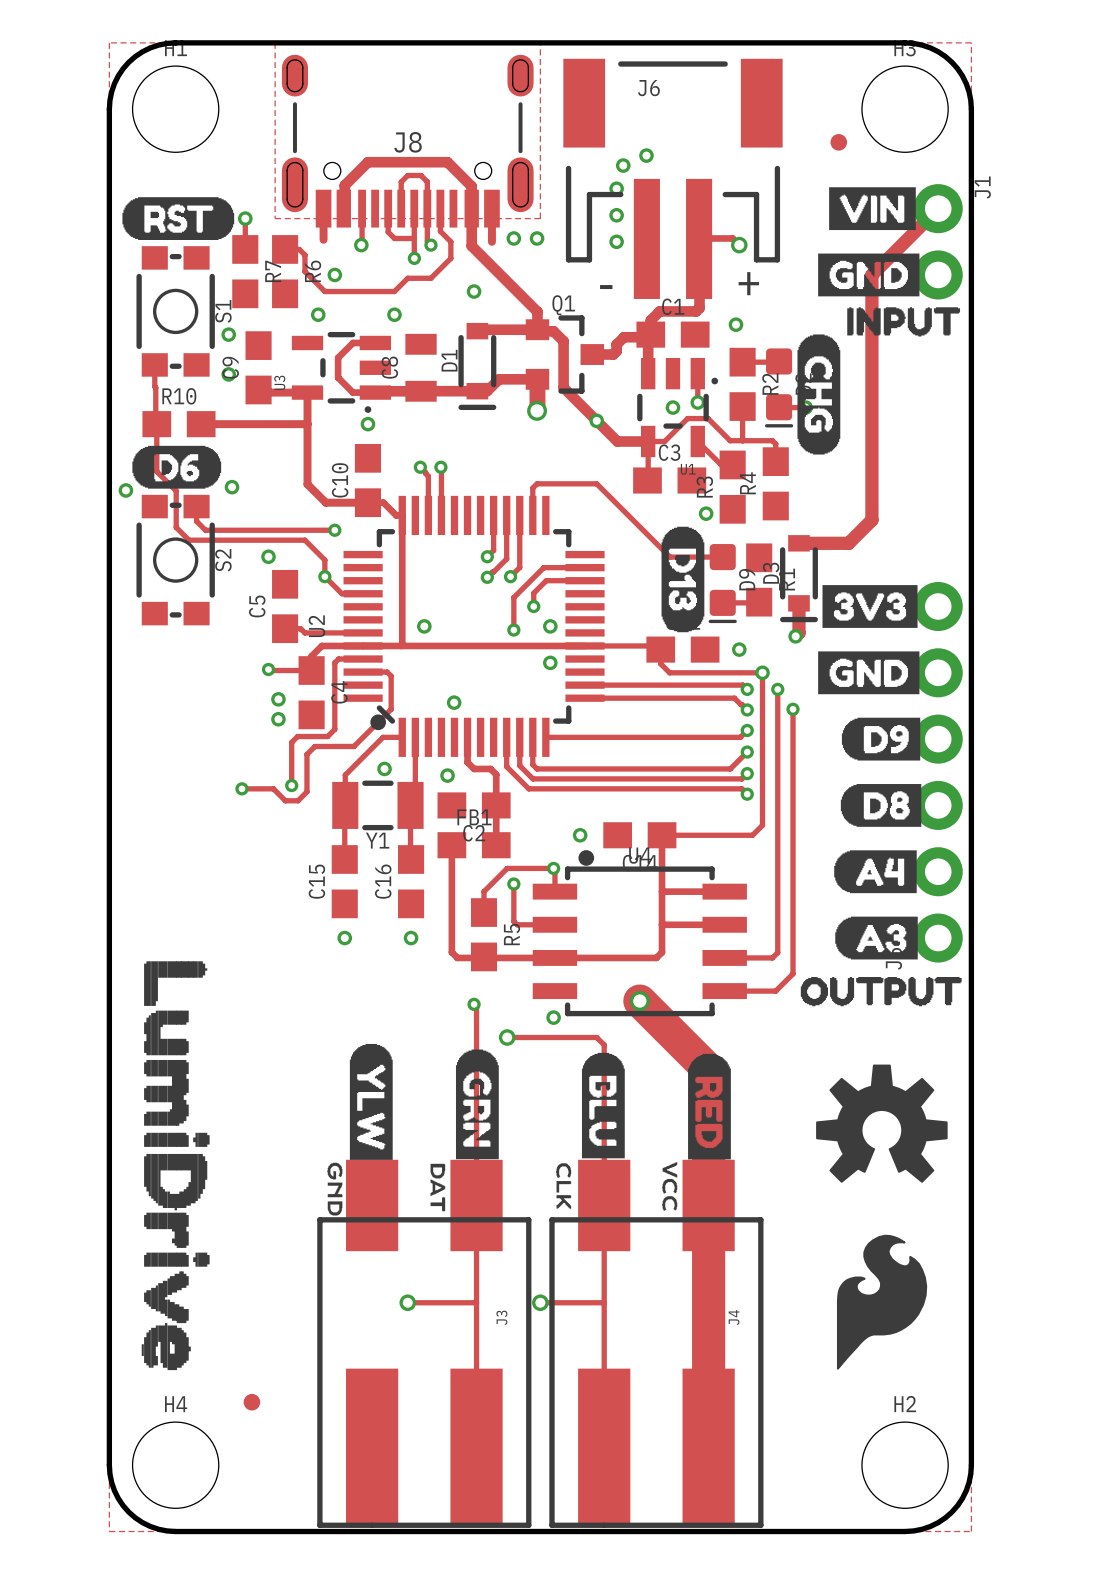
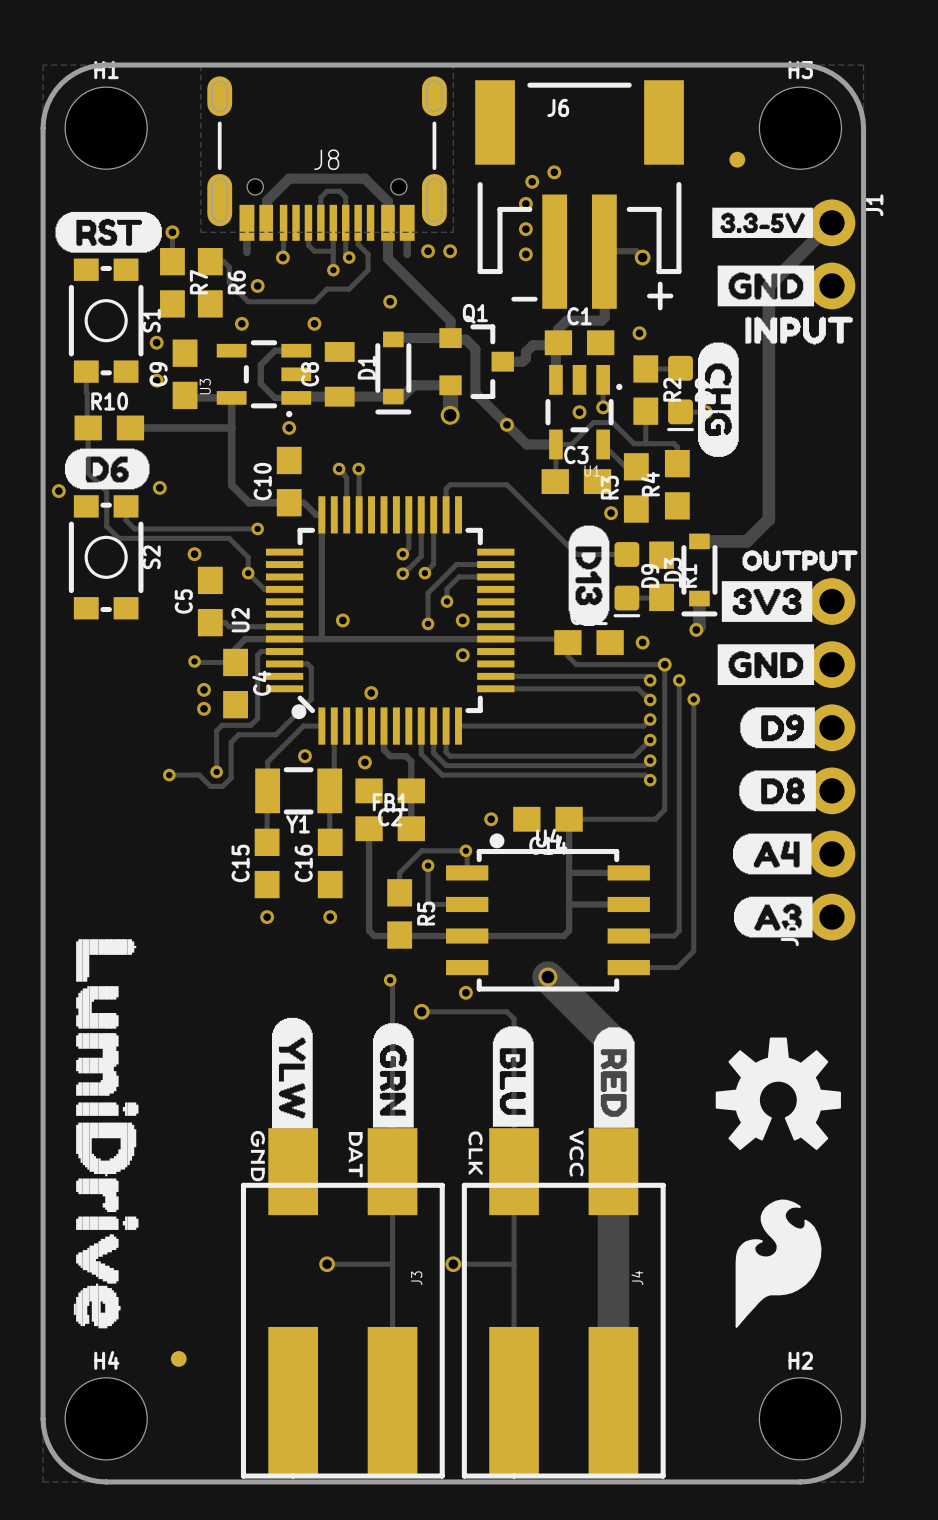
drawing shape: [829, 187, 916, 231] -> [712, 207, 813, 238]
drawing: none -> [742, 550, 858, 572]
drawing: [800, 976, 962, 1007] -> none

